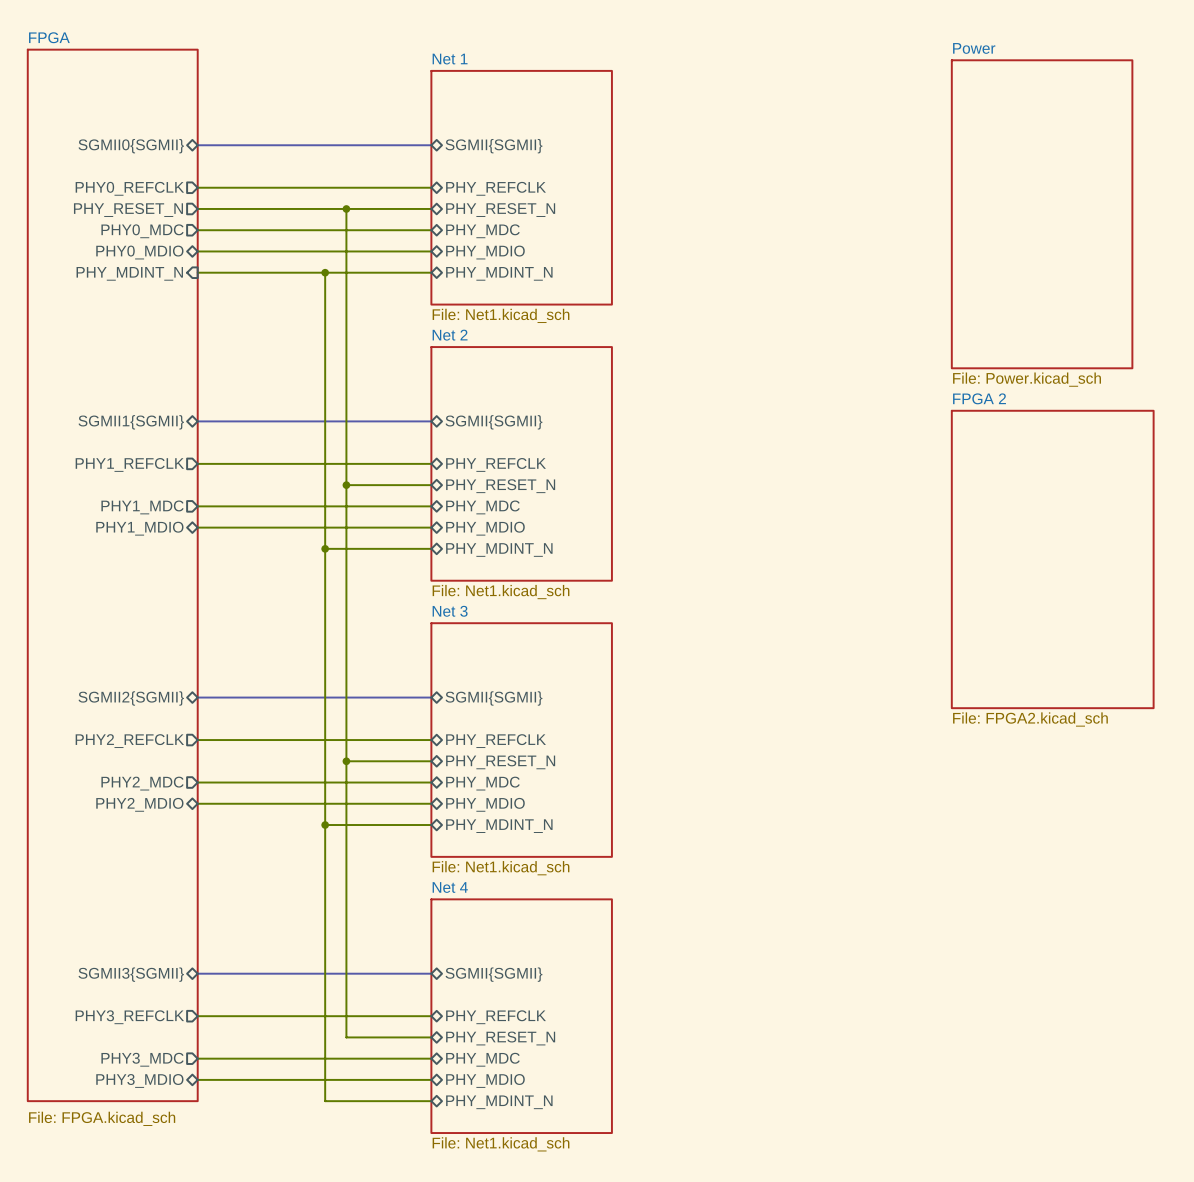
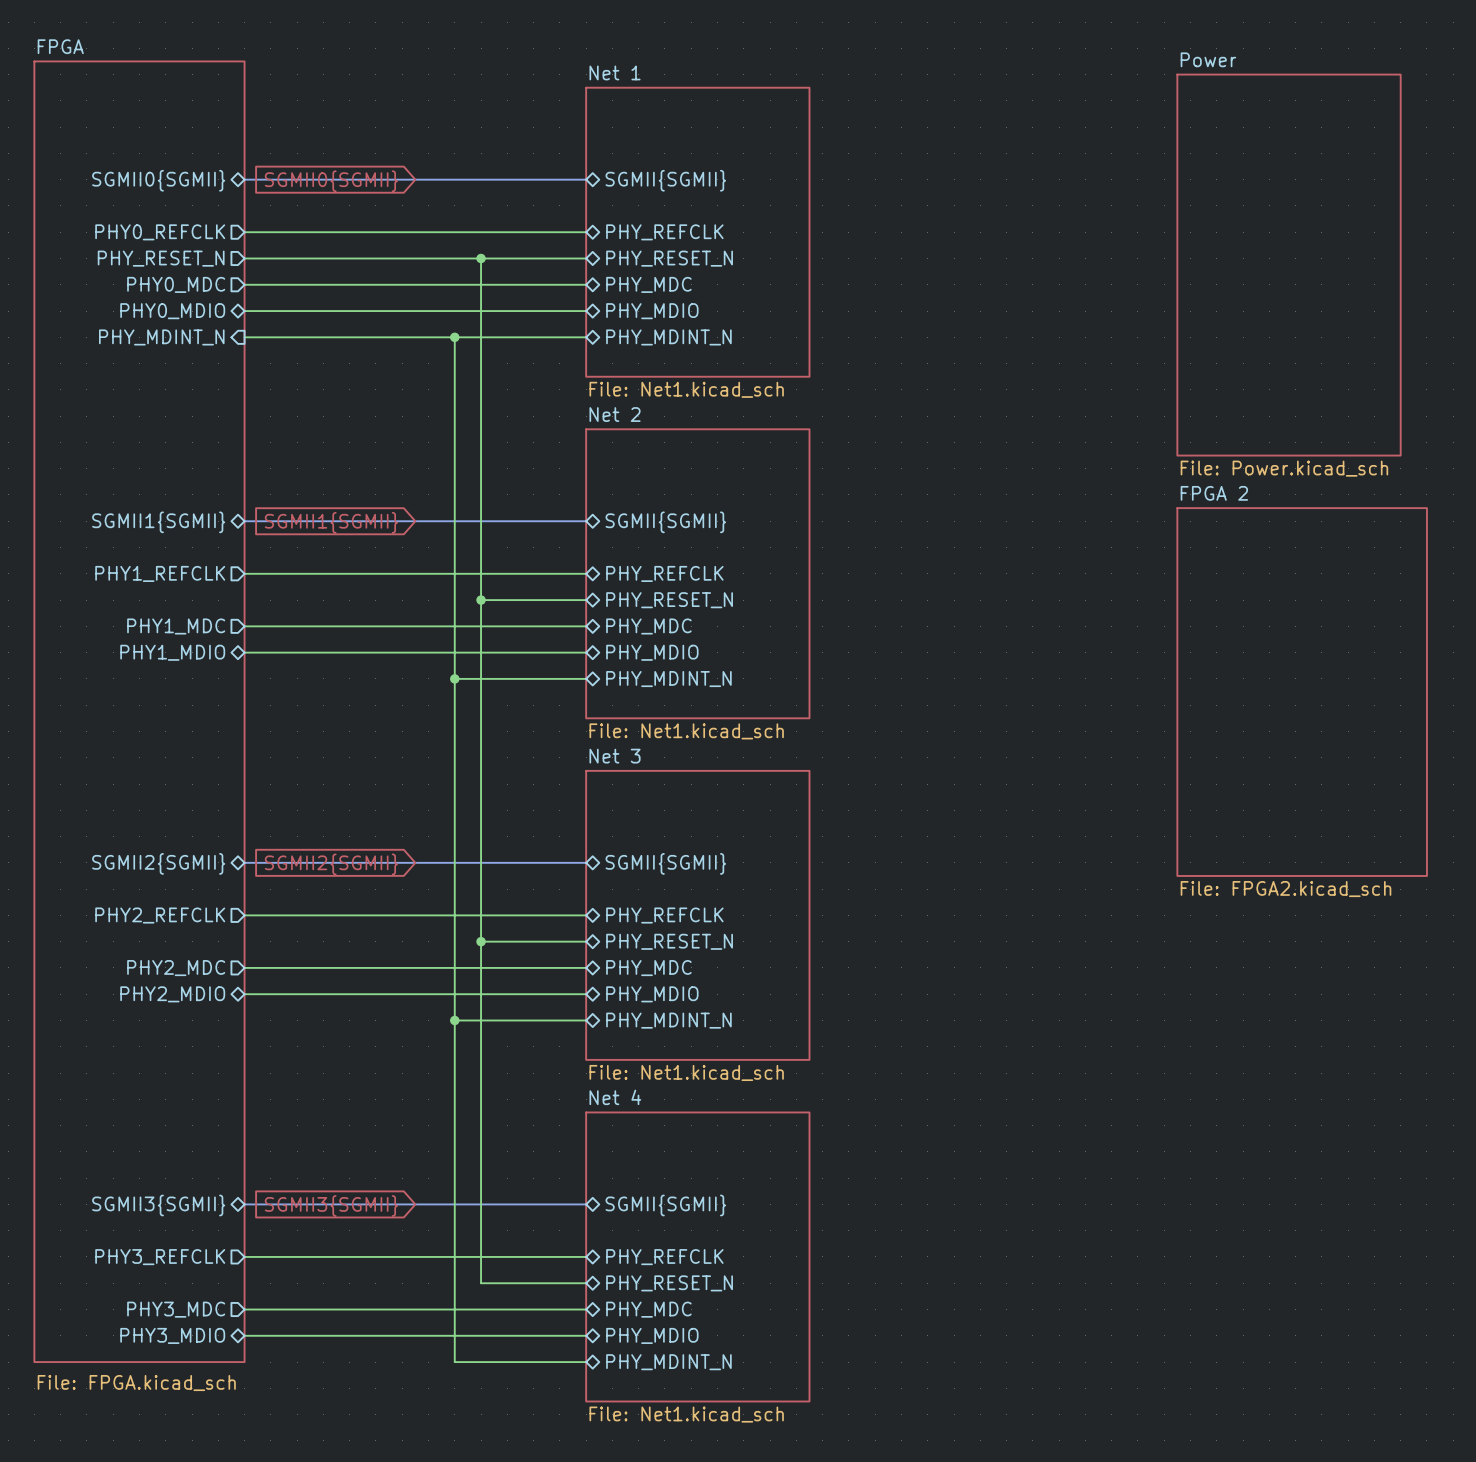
bus: none -> (533, 179) (586, 179)
global label: none -> SGMII0{SGMII} (331, 181)
sheet pin position: SGMII{SGMII} (493, 146) -> SGMII{SGMII} (665, 180)
wire: none -> (533, 232) (586, 232)
sheet Net 1 position: (521, 187) -> (697, 232)
sheet pin position: PHY_REFCLK (496, 188) -> PHY_REFCLK (664, 232)
wire: (346, 208) (346, 1037) (388, 1037) -> (481, 258) (481, 1283)
junction: (346, 208) -> none
junction: none -> (481, 258)
wire: none -> (533, 258) (586, 258)
sheet pin position: PHY_RESET_N (500, 210) -> PHY_RESET_N (669, 258)
wire: none -> (533, 284) (586, 284)
sheet pin position: PHY_MDC (482, 231) -> PHY_MDC (648, 284)
wire: none -> (533, 311) (586, 311)
sheet pin position: PHY_MDIO (485, 252) -> PHY_MDIO (652, 311)
wire: (325, 272) (325, 1101) (367, 1101) -> (454, 337) (454, 1362)
junction: (325, 272) -> none
junction: none -> (454, 337)
wire: none -> (533, 337) (586, 337)
sheet pin position: PHY_MDINT_N (499, 273) -> PHY_MDINT_N (668, 337)
bus: none -> (533, 521) (586, 521)
global label: none -> SGMII1{SGMII} (331, 522)
sheet pin position: SGMII{SGMII} (493, 422) -> SGMII{SGMII} (665, 522)
wire: none -> (533, 573) (586, 573)
sheet Net 2 position: (521, 463) -> (697, 573)
sheet pin position: PHY_REFCLK (496, 464) -> PHY_REFCLK (664, 573)
wire: (346, 485) (388, 485) -> (533, 600) (586, 600)
junction: (346, 485) -> none
junction: none -> (481, 600)
sheet pin position: PHY_RESET_N (500, 486) -> PHY_RESET_N (669, 600)
wire: none -> (533, 626) (586, 626)
sheet pin position: PHY_MDC (482, 507) -> PHY_MDC (648, 626)
wire: none -> (533, 652) (586, 652)
sheet pin position: PHY_MDIO (485, 528) -> PHY_MDIO (652, 652)
wire: (325, 548) (367, 548) -> (533, 678) (586, 678)
junction: (325, 548) -> none
junction: none -> (454, 678)
sheet pin position: PHY_MDINT_N (499, 549) -> PHY_MDINT_N (668, 679)
bus: none -> (533, 862) (586, 862)
global label: none -> SGMII2{SGMII} (331, 864)
sheet pin position: SGMII{SGMII} (493, 698) -> SGMII{SGMII} (665, 863)
wire: none -> (533, 915) (586, 915)
sheet Net 3 position: (521, 740) -> (697, 915)
sheet pin position: PHY_REFCLK (496, 741) -> PHY_REFCLK (664, 915)
wire: (346, 761) (388, 761) -> (533, 941) (586, 941)
junction: (346, 761) -> none
junction: none -> (481, 941)
sheet pin position: PHY_RESET_N (500, 762) -> PHY_RESET_N (669, 941)
wire: none -> (533, 967) (586, 967)
sheet pin position: PHY_MDC (482, 783) -> PHY_MDC (648, 968)
wire: none -> (533, 994) (586, 994)
sheet pin position: PHY_MDIO (485, 804) -> PHY_MDIO (652, 994)
wire: (325, 825) (367, 825) -> (533, 1020) (586, 1020)
junction: (325, 825) -> none
junction: none -> (454, 1020)
sheet pin position: PHY_MDINT_N (499, 826) -> PHY_MDINT_N (668, 1020)
bus: none -> (533, 1204) (586, 1204)
sheet pin position: SGMII{SGMII} (493, 974) -> SGMII{SGMII} (665, 1205)
global label: none -> SGMII3{SGMII} (331, 1205)
wire: none -> (533, 1256) (586, 1256)
sheet Net 4 position: (521, 1016) -> (697, 1256)
sheet pin position: PHY_REFCLK (496, 1017) -> PHY_REFCLK (664, 1257)
wire: none -> (533, 1283) (586, 1283)
sheet pin position: PHY_RESET_N (500, 1038) -> PHY_RESET_N (669, 1283)
wire: none -> (533, 1309) (586, 1309)
sheet pin position: PHY_MDC (482, 1059) -> PHY_MDC (648, 1309)
wire: none -> (533, 1335) (586, 1335)
sheet pin position: PHY_MDIO (485, 1080) -> PHY_MDIO (652, 1335)
wire: none -> (533, 1362) (586, 1362)
sheet pin position: PHY_MDINT_N (499, 1102) -> PHY_MDINT_N (668, 1362)

